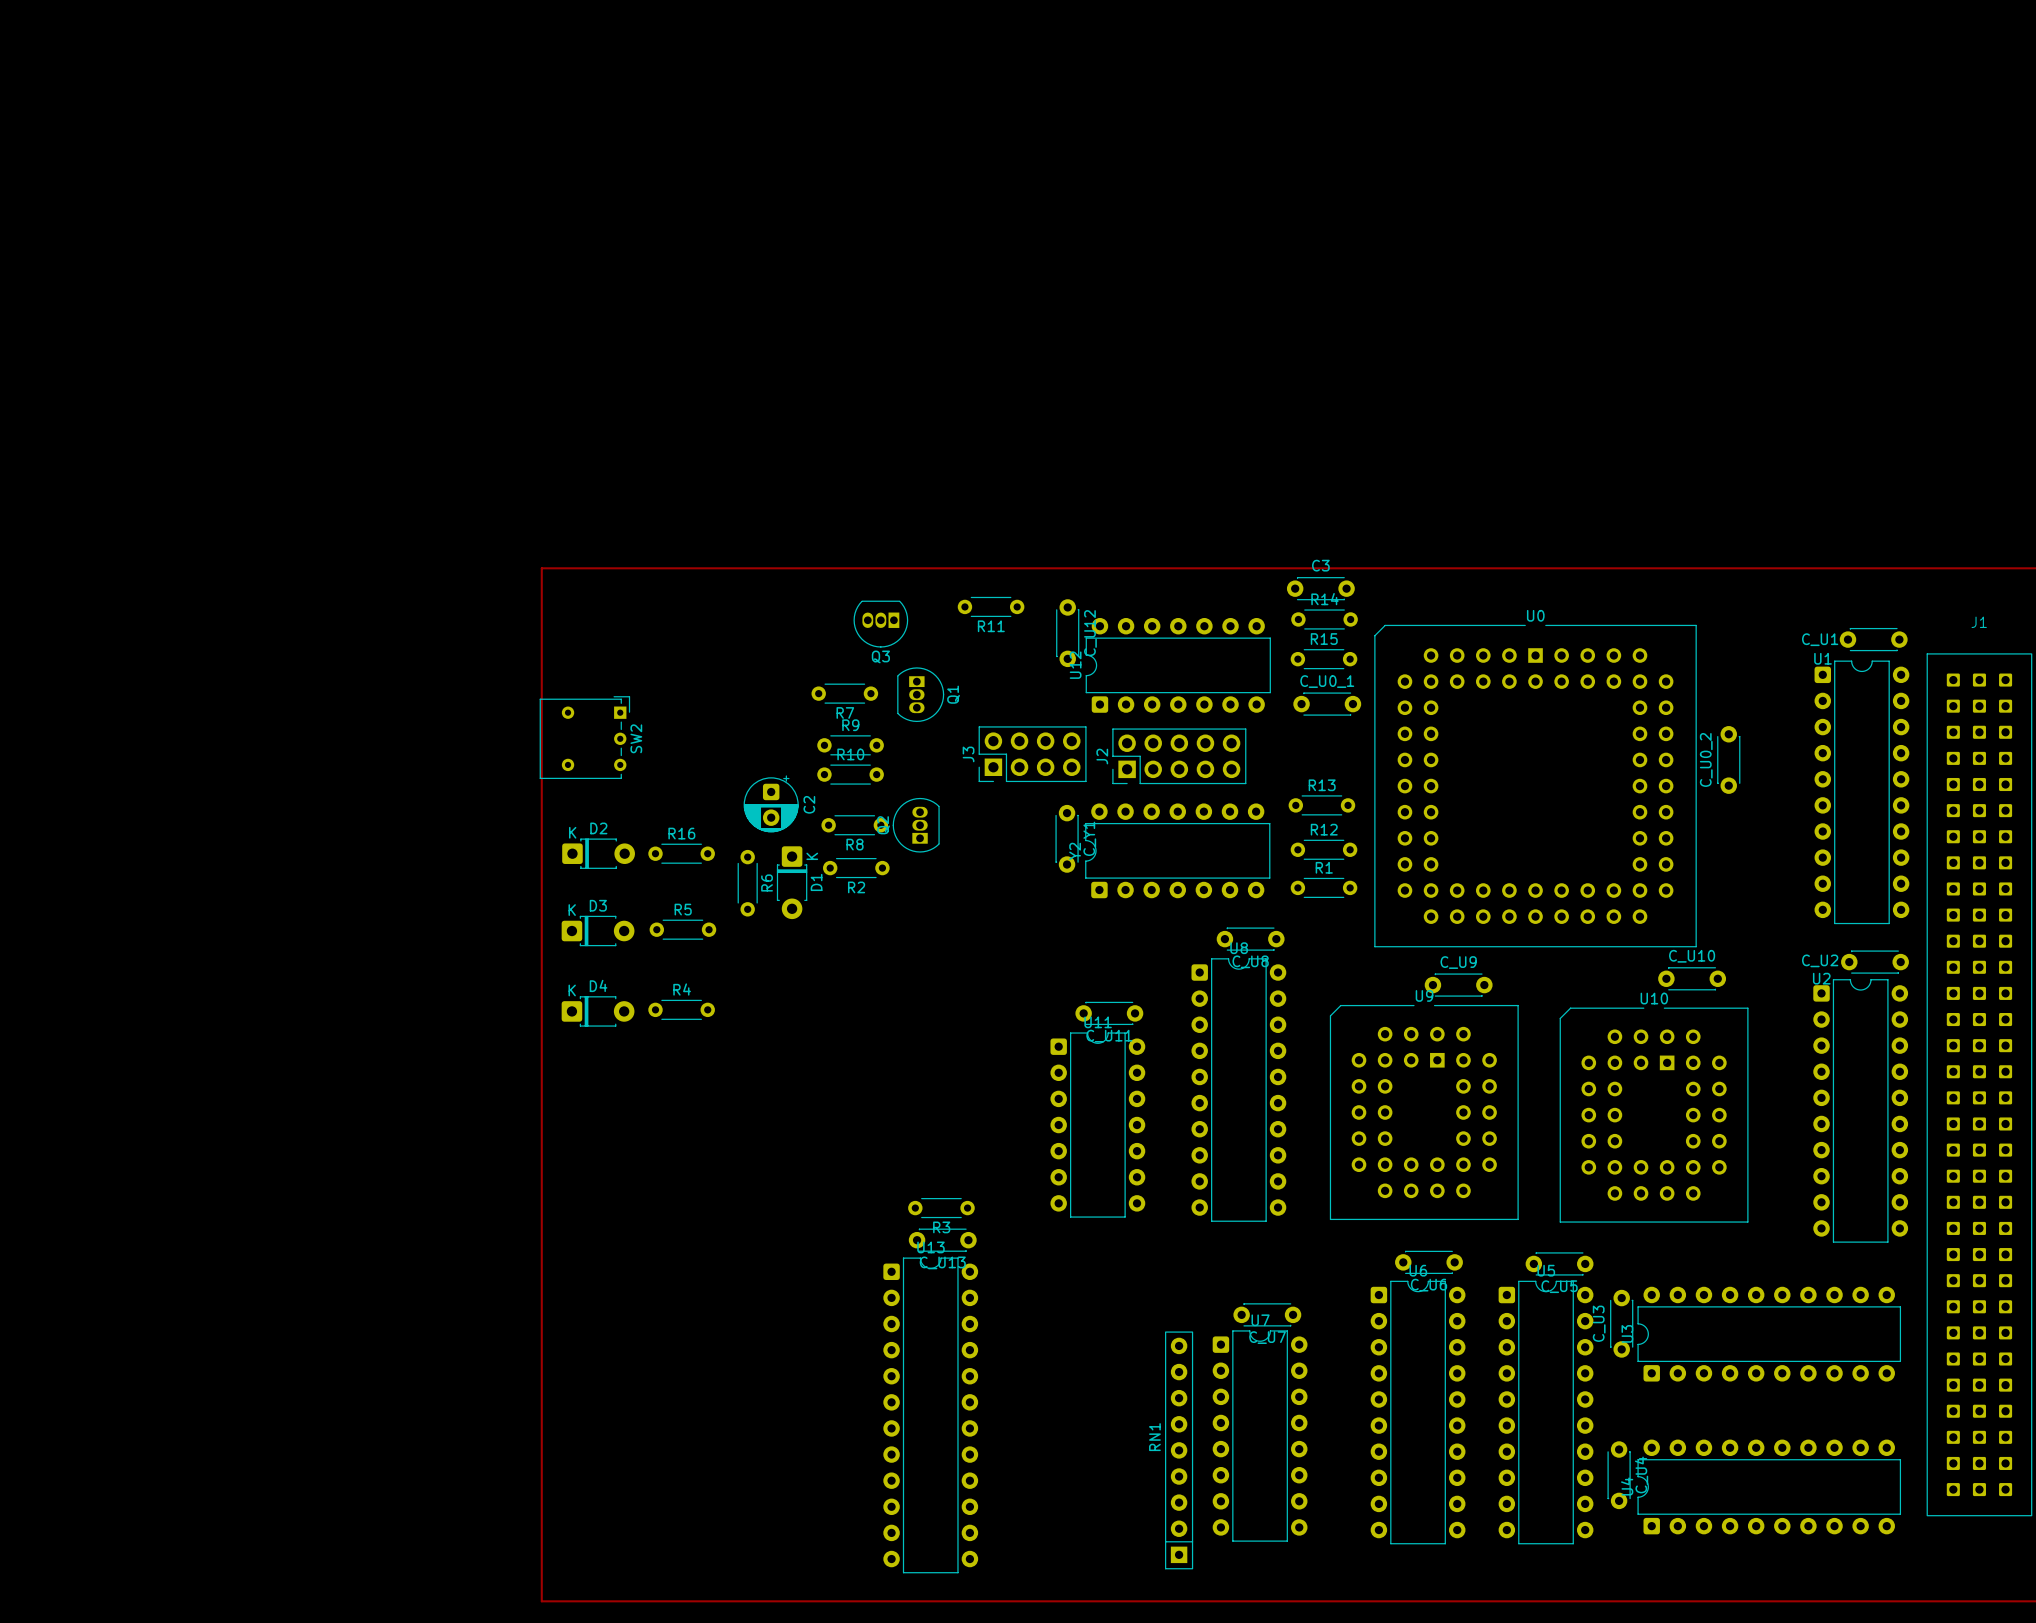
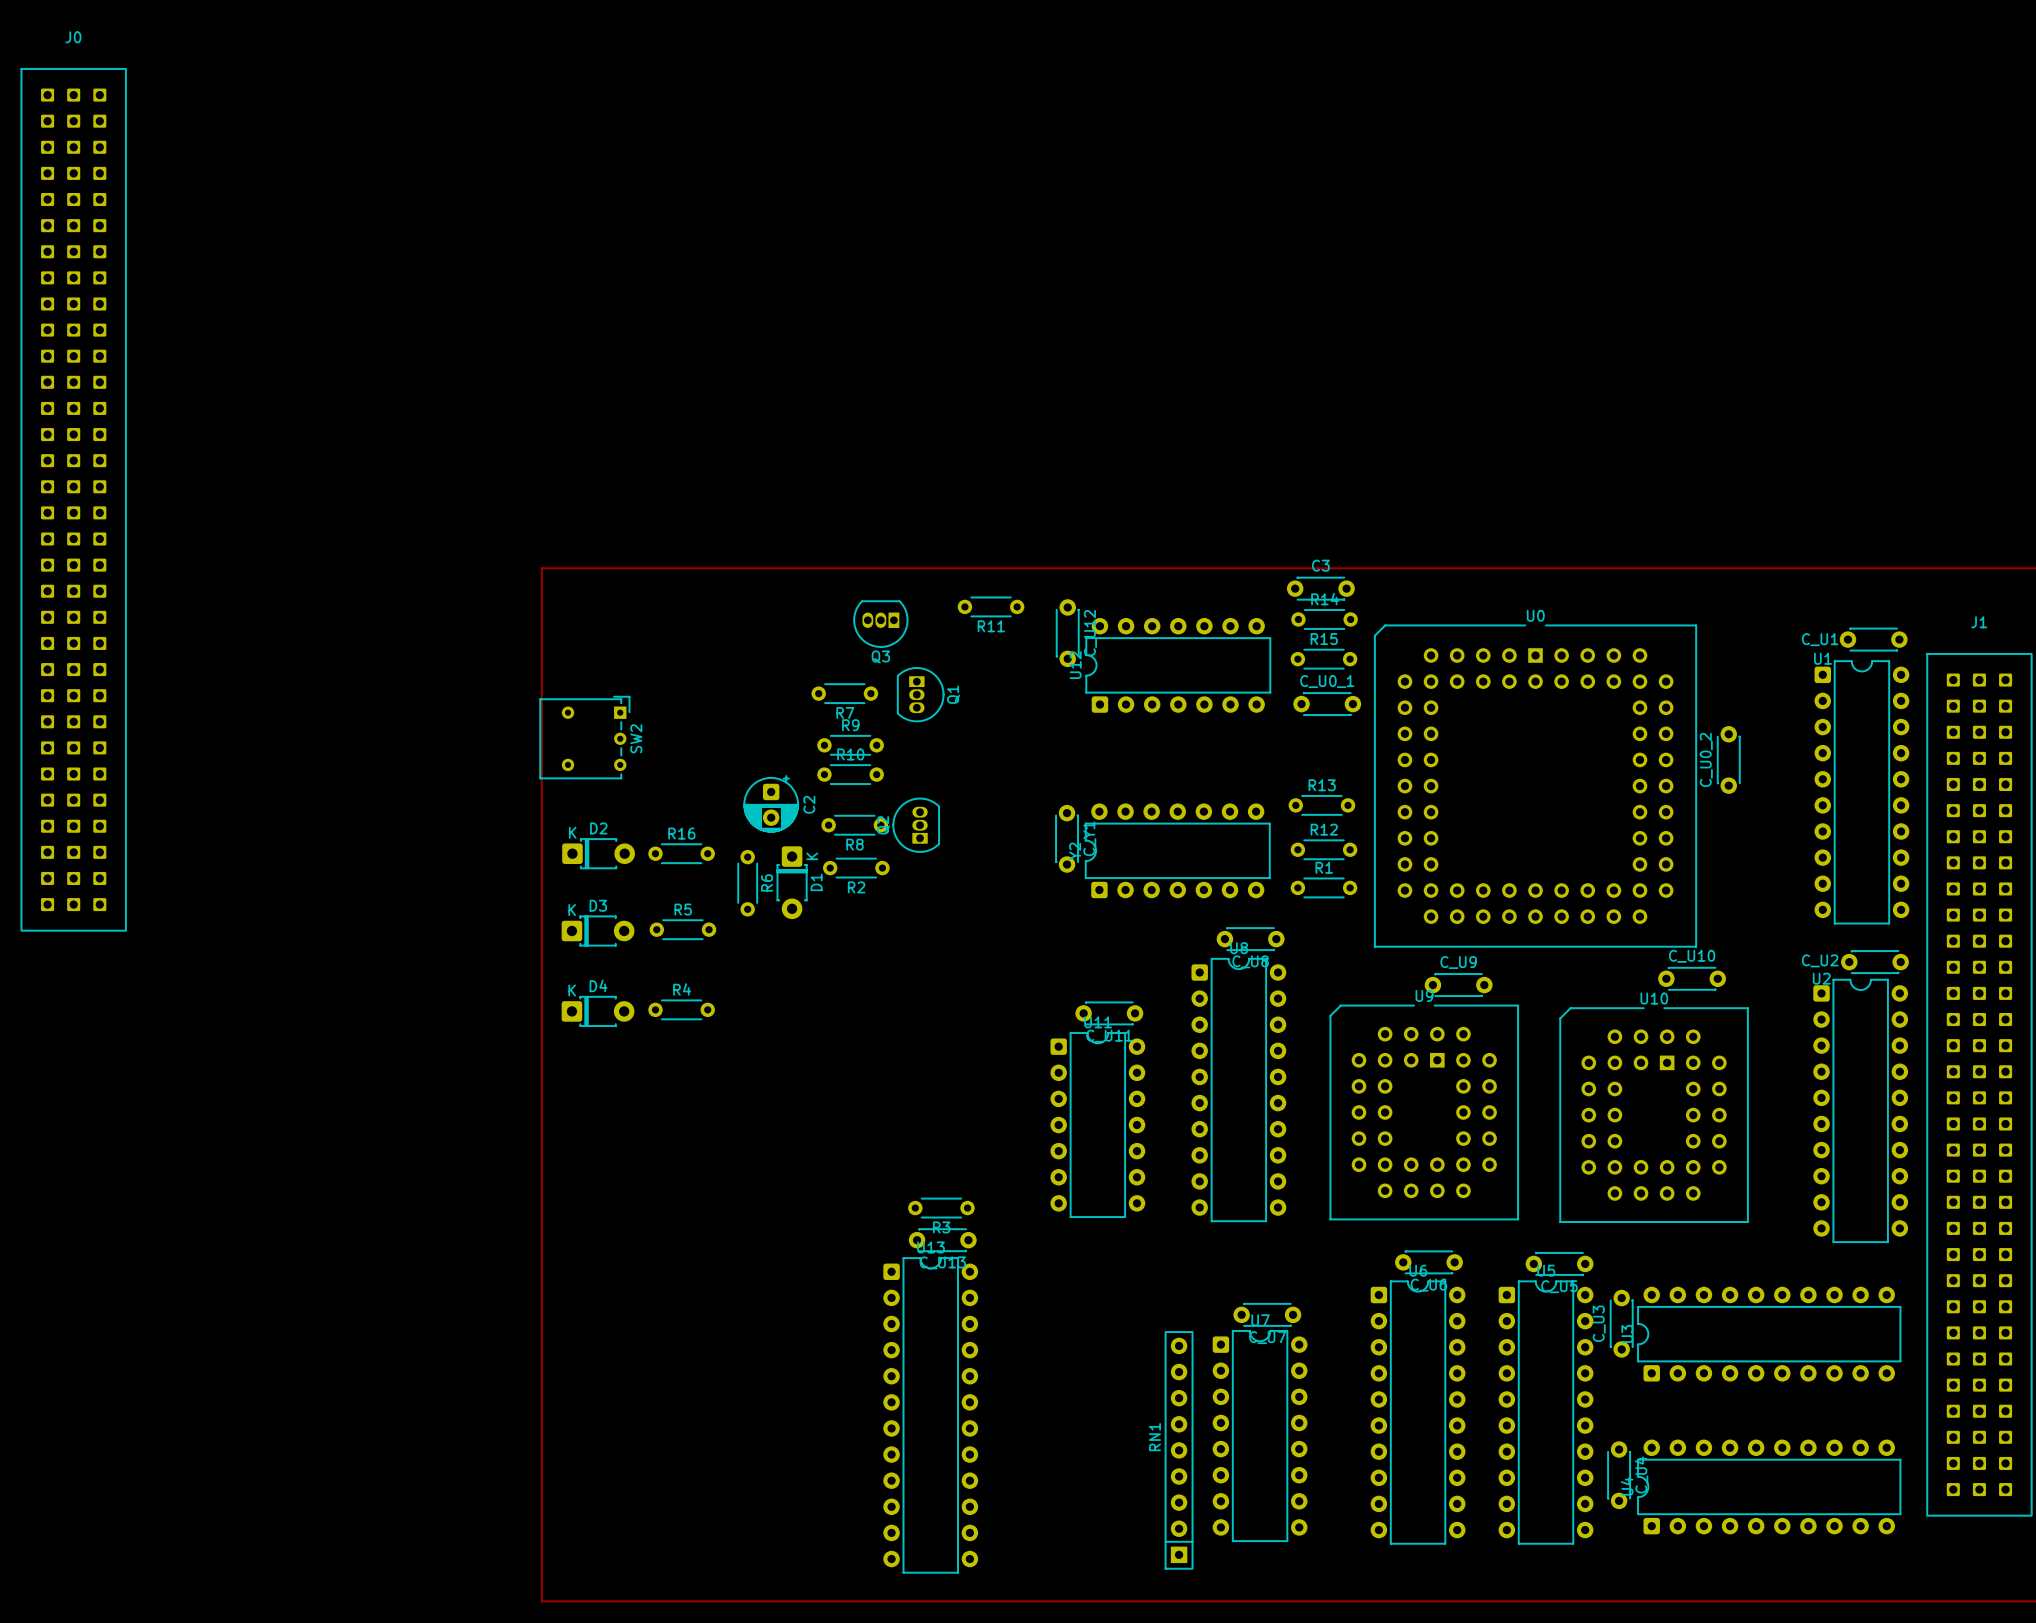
J0: none -> (73, 499)
J3: (1032, 754) -> none
J2: (1179, 756) -> none

